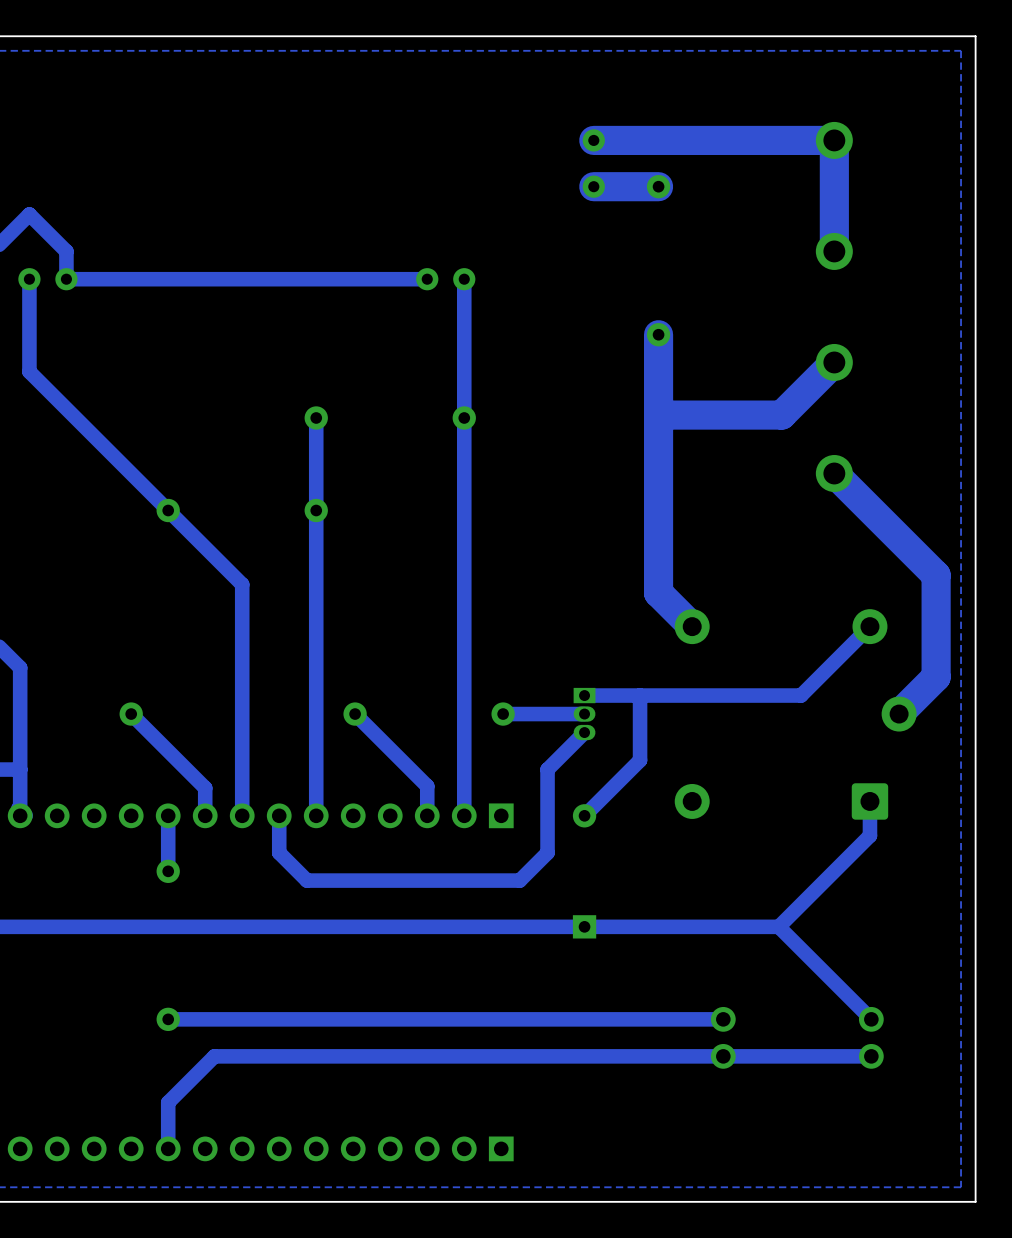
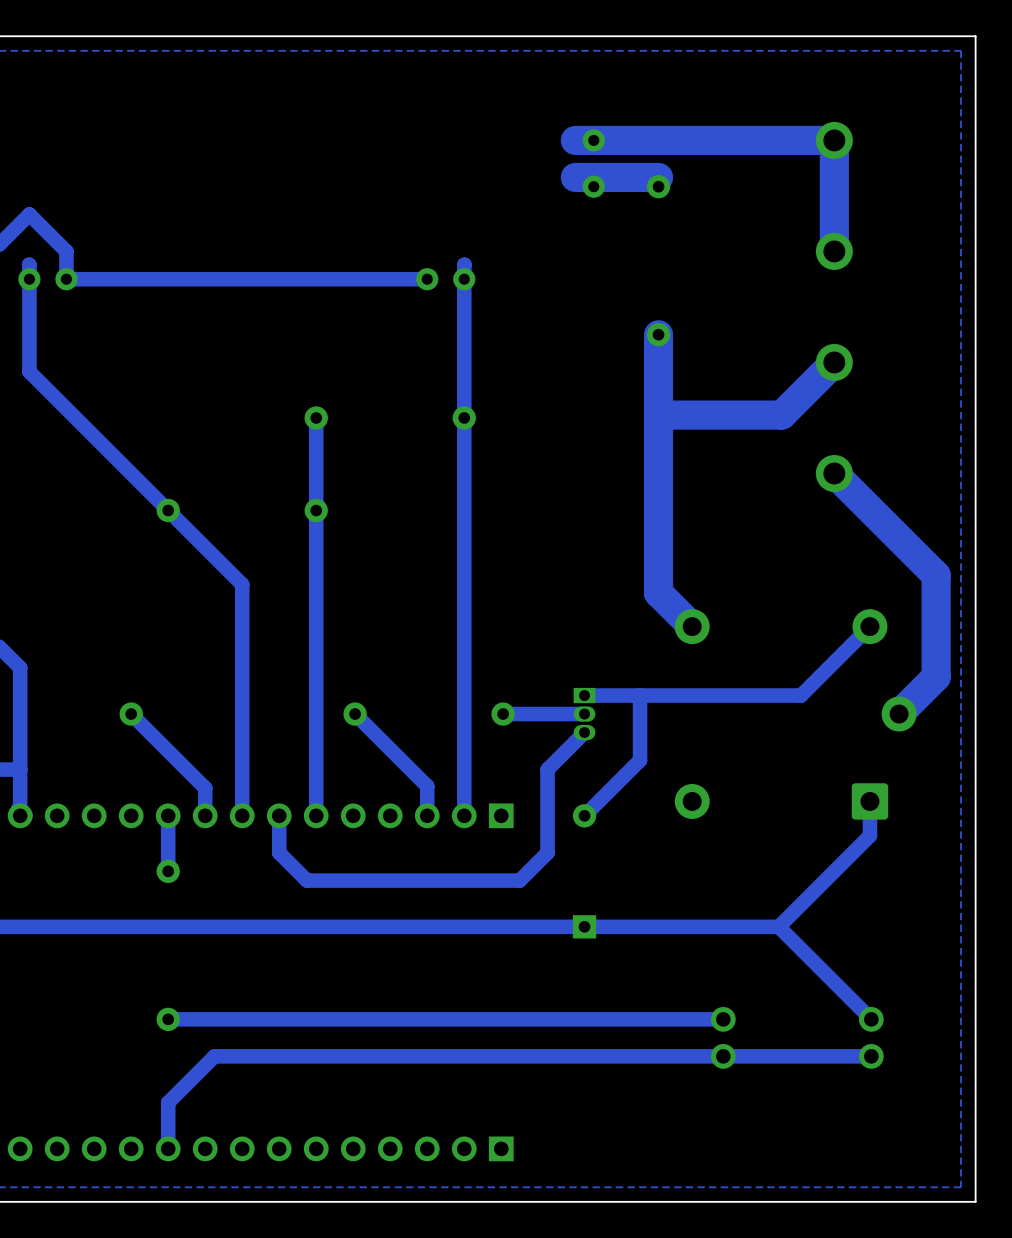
track: none -> (593, 140) (575, 140)
track: none -> (658, 177) (575, 177)
track: (658, 186) (593, 186) -> none
track: none -> (29, 264) (29, 279)
track: none -> (464, 264) (464, 279)

